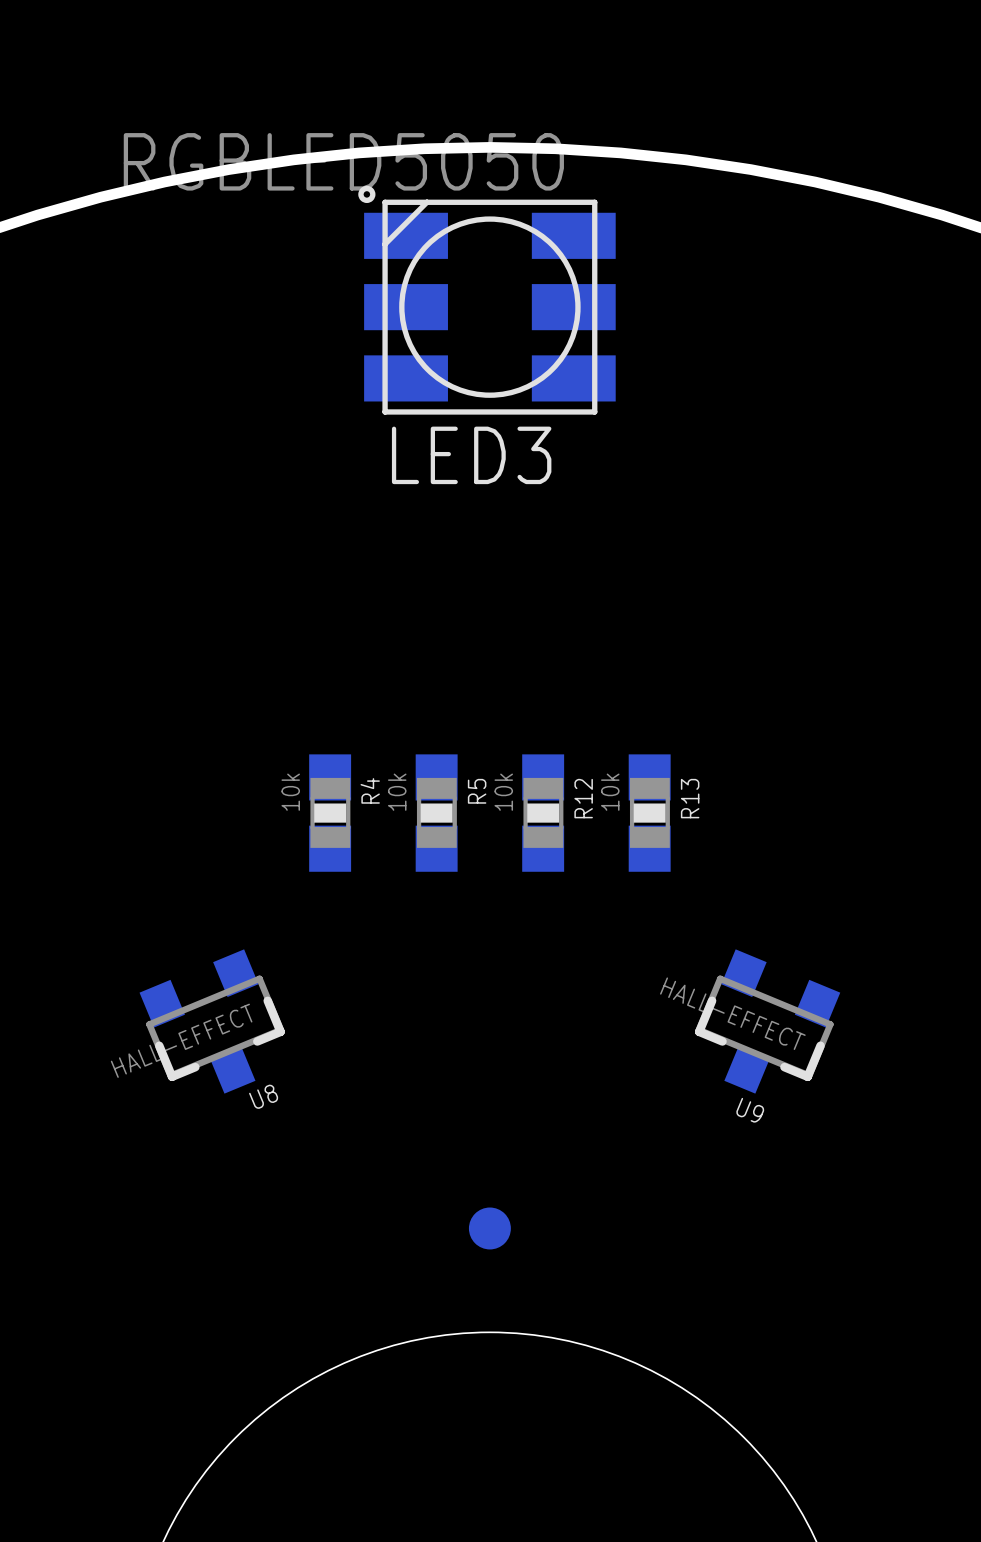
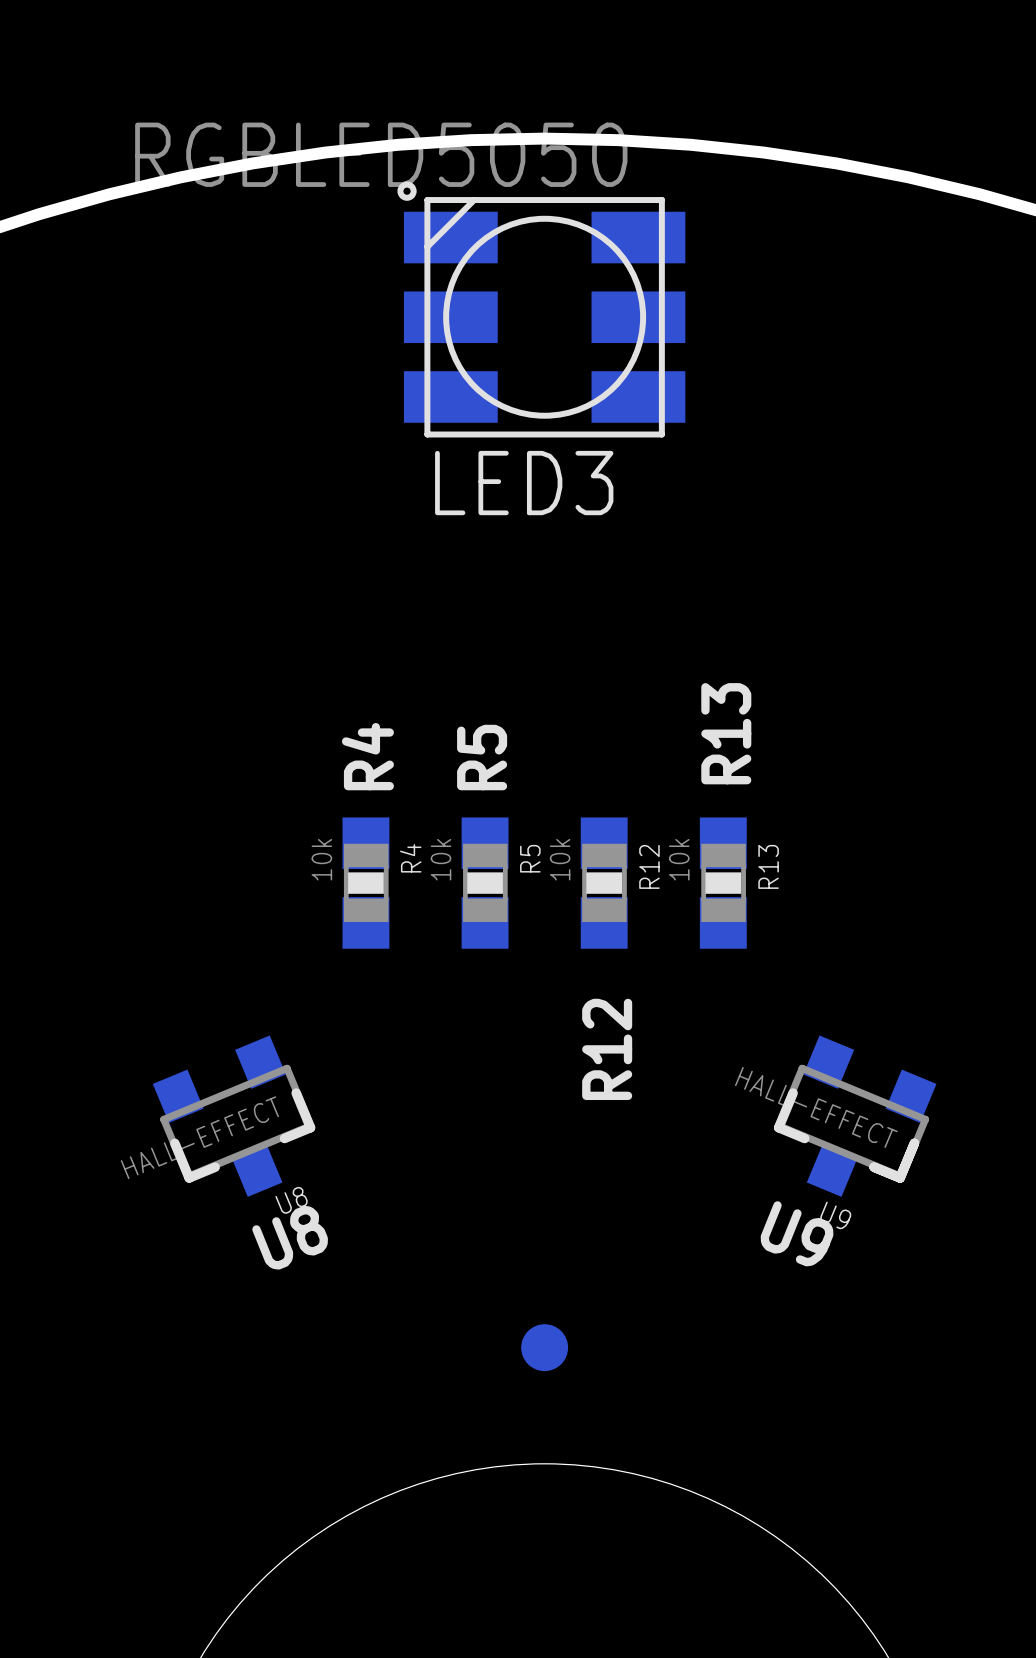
text: none -> R13 (726, 733)
text: none -> R4 (367, 756)
text: none -> R5 (482, 757)
text: none -> R12 (607, 1049)
line: none -> (914, 1143) (900, 1177) (874, 1167)
text: none -> U9 (797, 1233)
text: none -> U8 (290, 1237)

